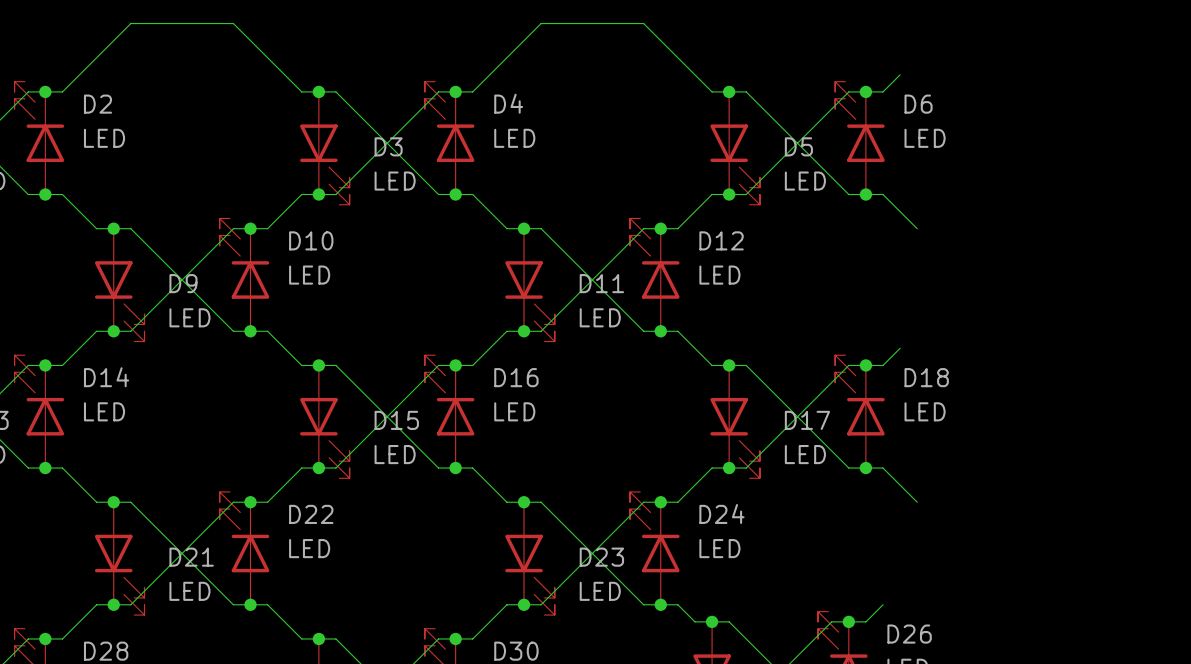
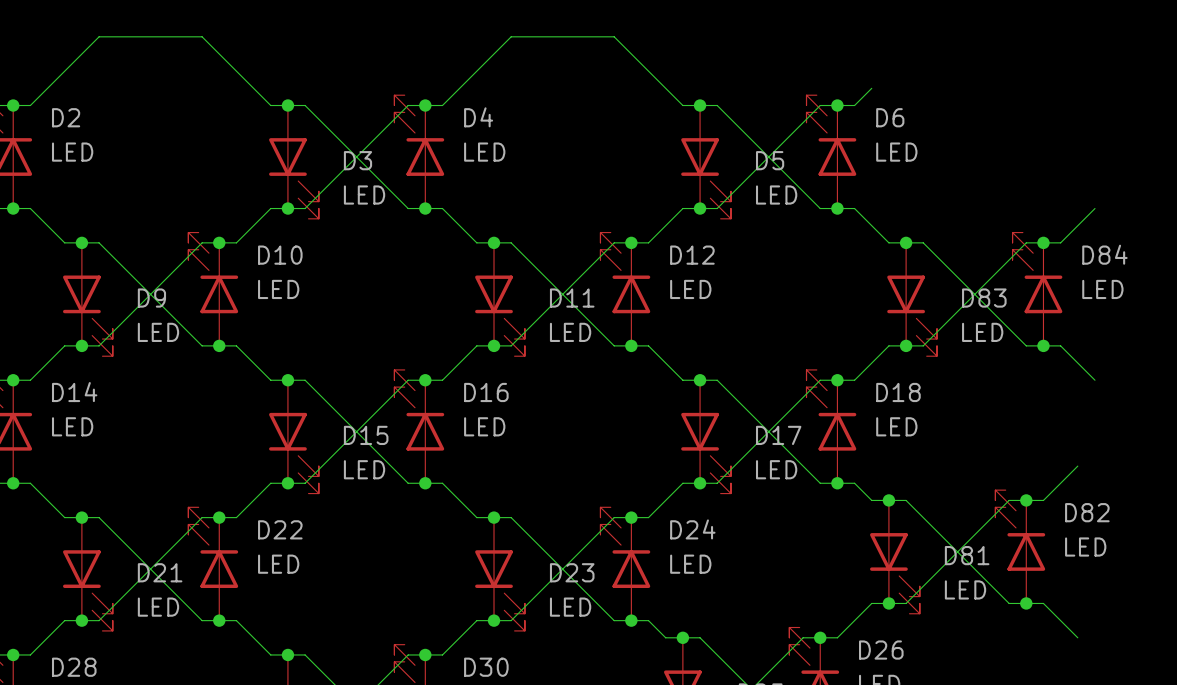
wire: none -> (1094, 208) (1060, 242) (1026, 242) (923, 345) (888, 345) (871, 363)
wire: none -> (888, 242) (923, 242) (1026, 345) (1060, 345) (1094, 380)
junction: none -> (906, 242)
junction: none -> (1043, 242)
D84: none -> LED (1037, 289)
D83: none -> LED (912, 299)
junction: none -> (906, 345)
junction: none -> (1043, 345)
wire: none -> (1077, 466) (1043, 500) (1009, 500) (906, 603) (871, 603) (854, 620)
wire: (900, 485) (917, 502) -> (871, 500) (906, 500) (1009, 603) (1043, 603) (1077, 637)
junction: none -> (888, 500)
junction: none -> (1026, 500)
D82: none -> LED (1020, 546)
D81: none -> LED (894, 557)
junction: none -> (888, 603)
junction: none -> (1026, 603)

